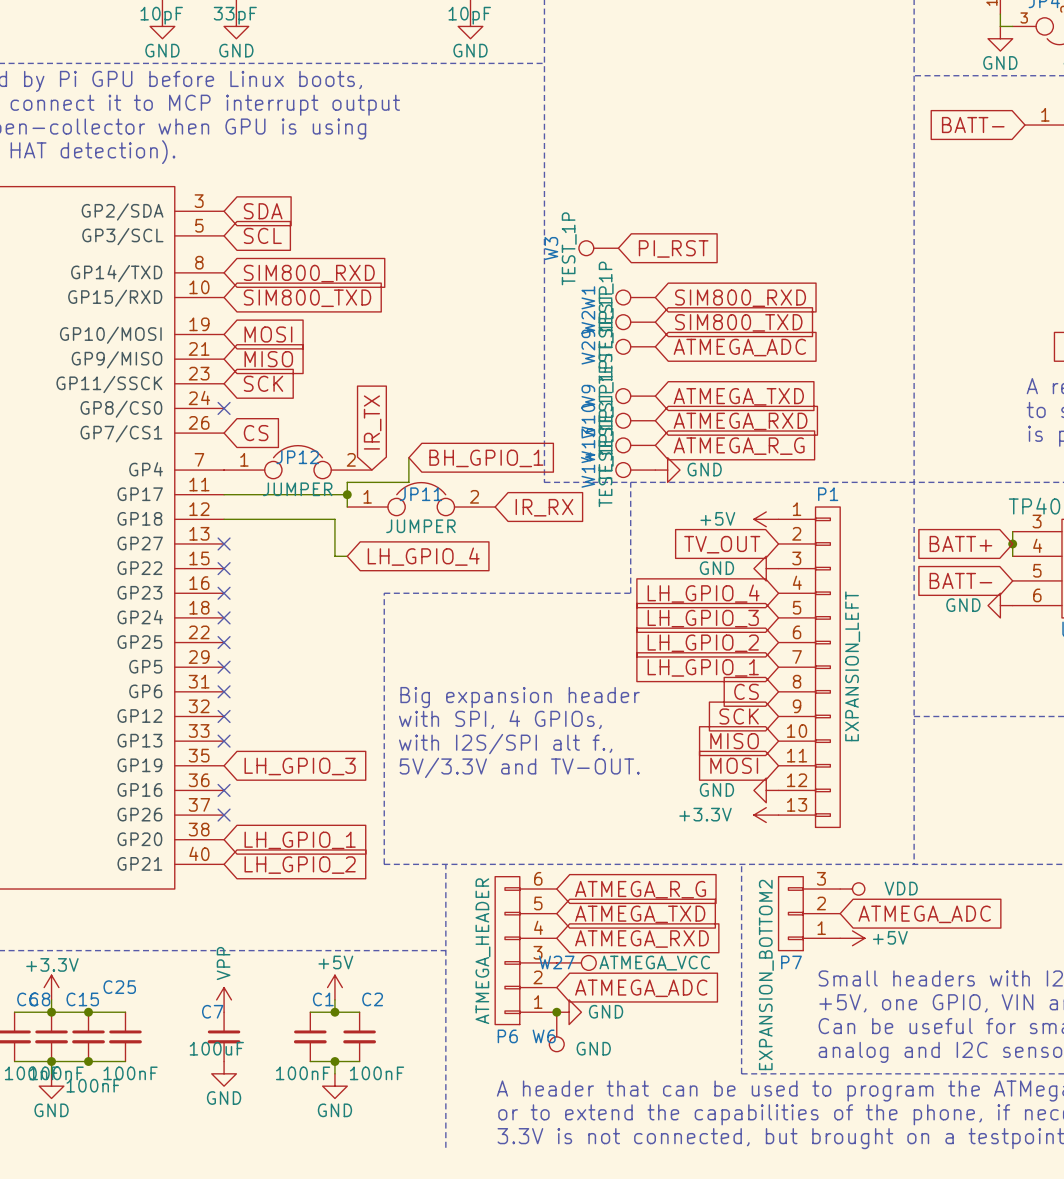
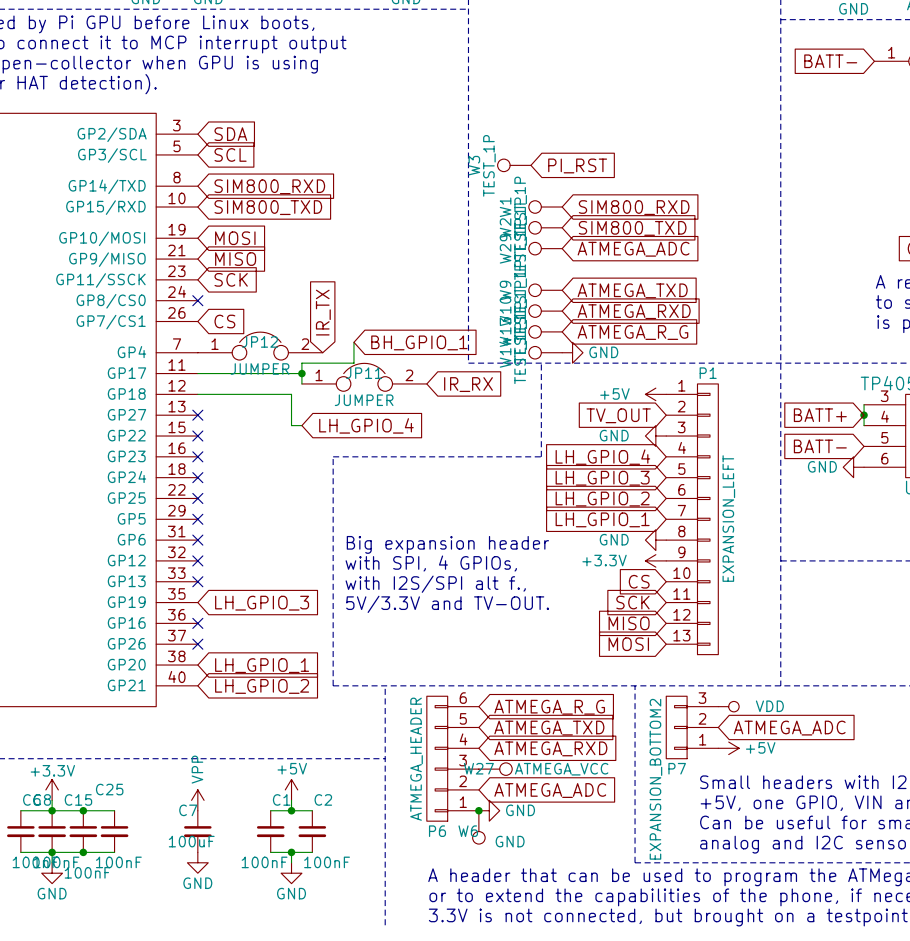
global label: CS (746, 691) -> none
global label: SCK (739, 716) -> none
global label: MISO (734, 741) -> CS (639, 581)
global label: MOSI (734, 765) -> SCK (632, 602)
global label: none -> MISO (629, 623)
power symbol position: GND (766, 790) -> GND (655, 540)
global label: none -> MOSI (628, 644)
power symbol position: +3.3V (766, 815) -> +3.3V (655, 560)

